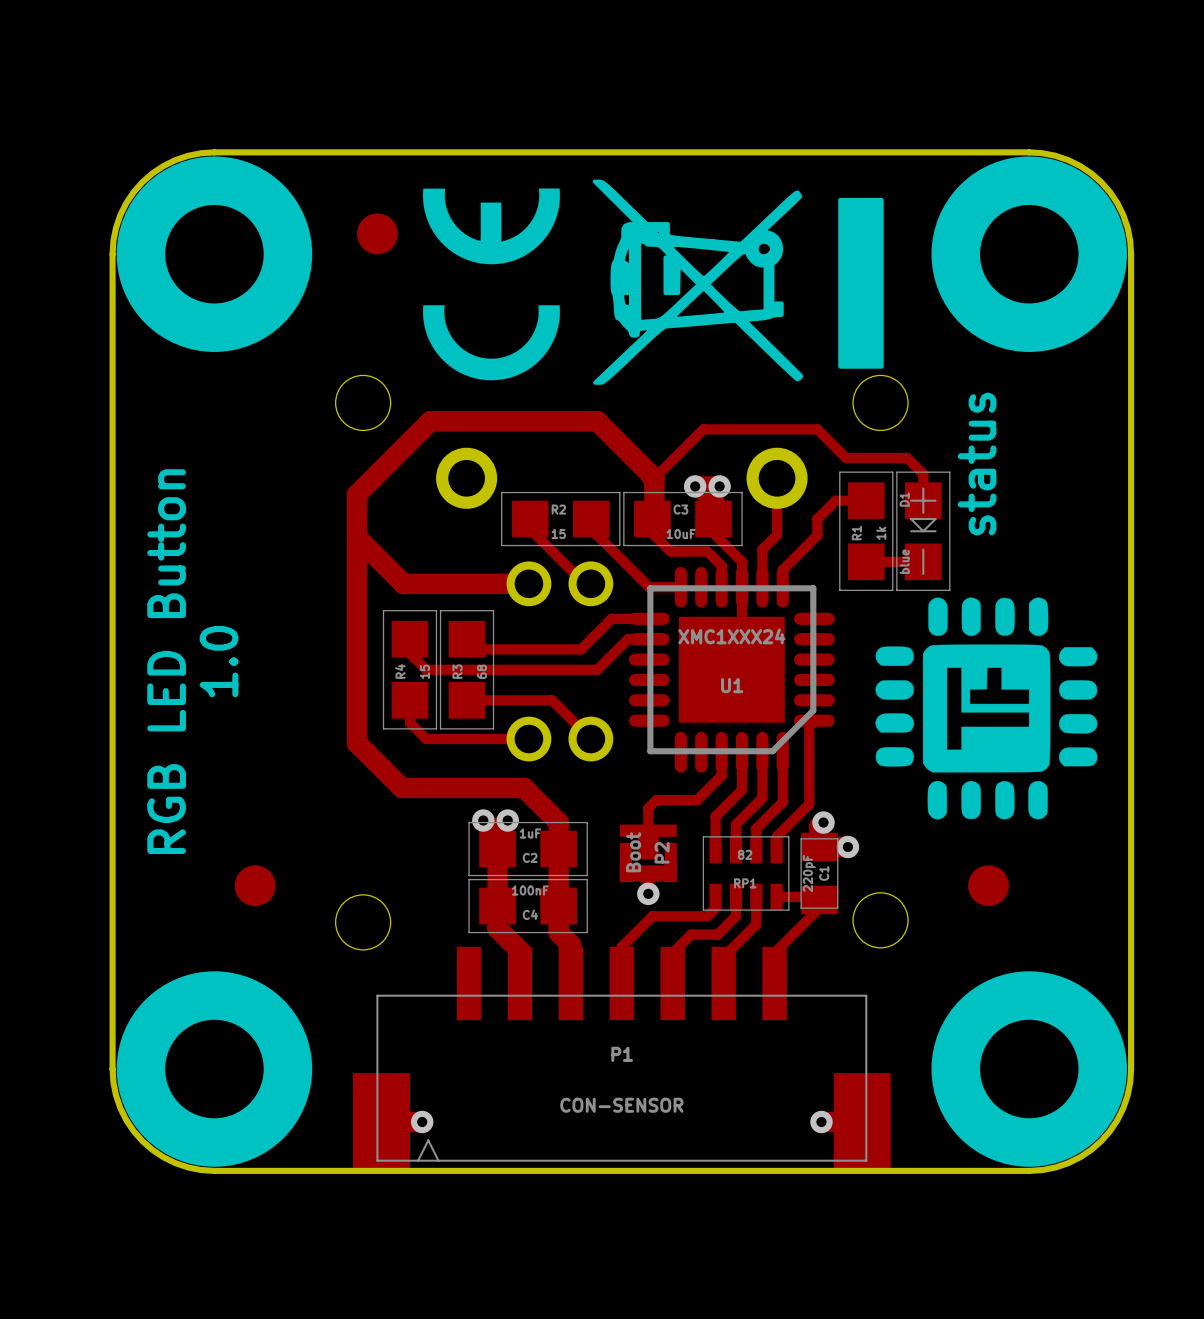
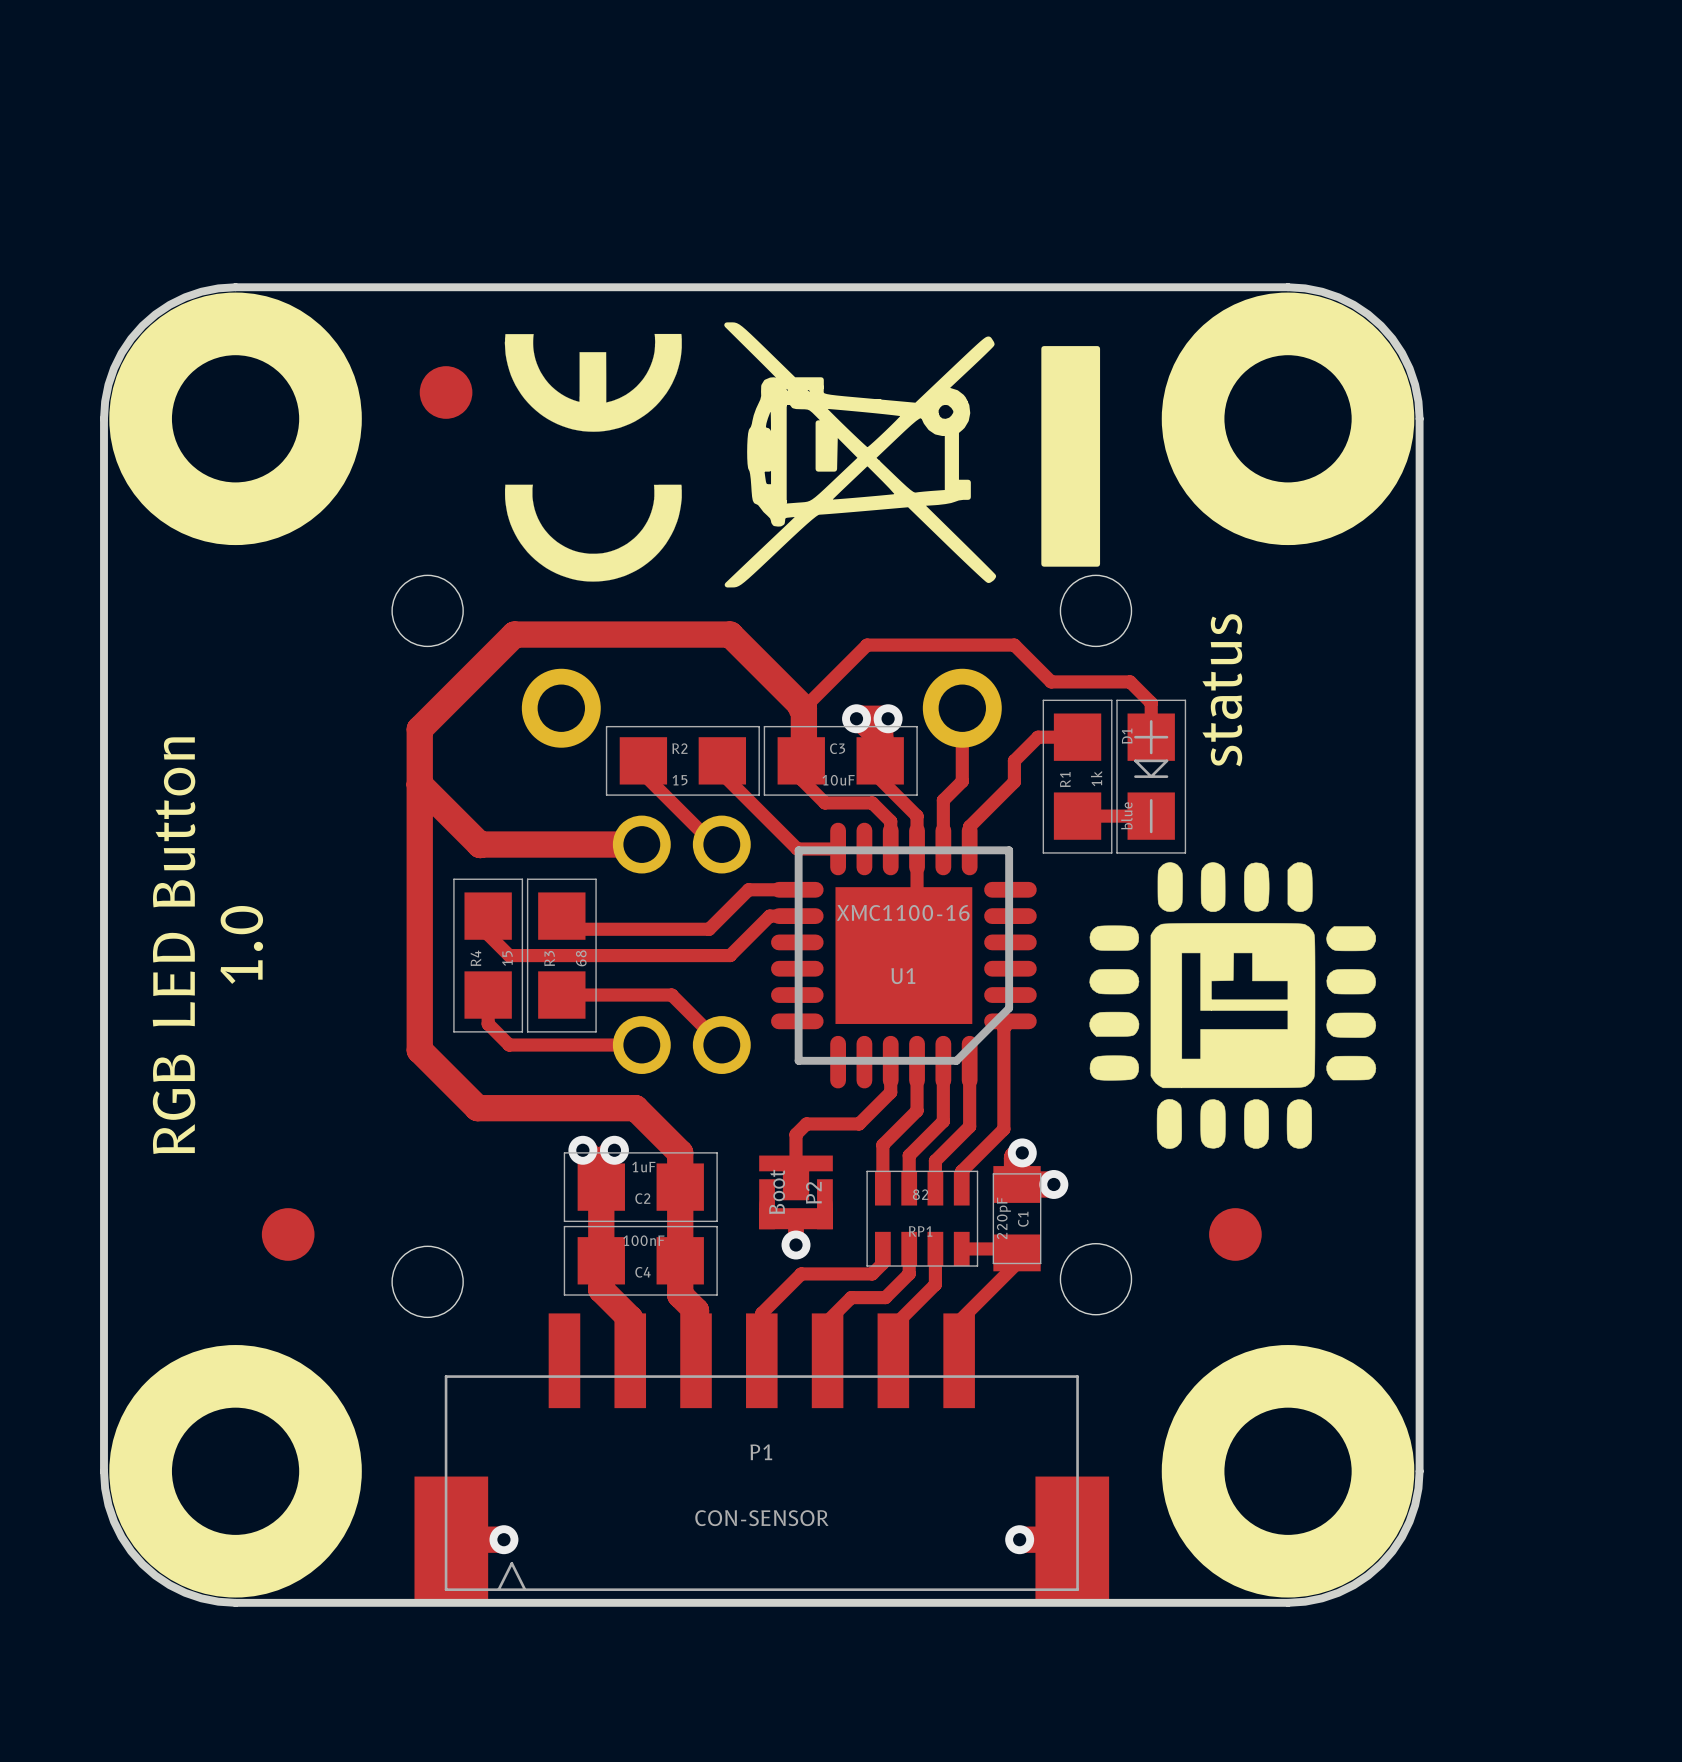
U1 value: XMC1XXX24 (731, 636) -> XMC1100-16 (903, 912)

